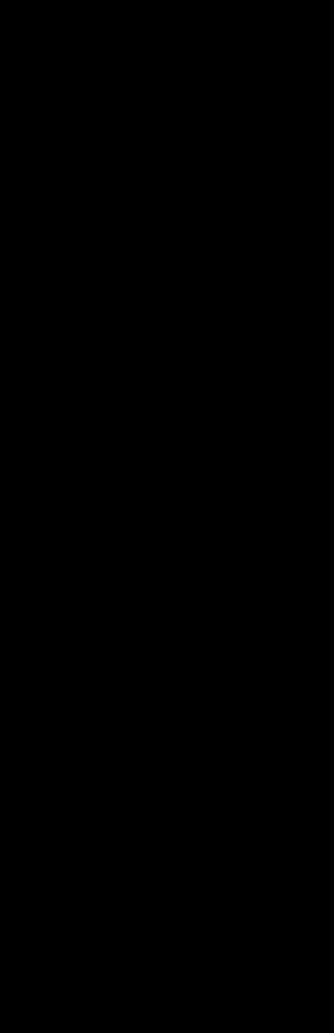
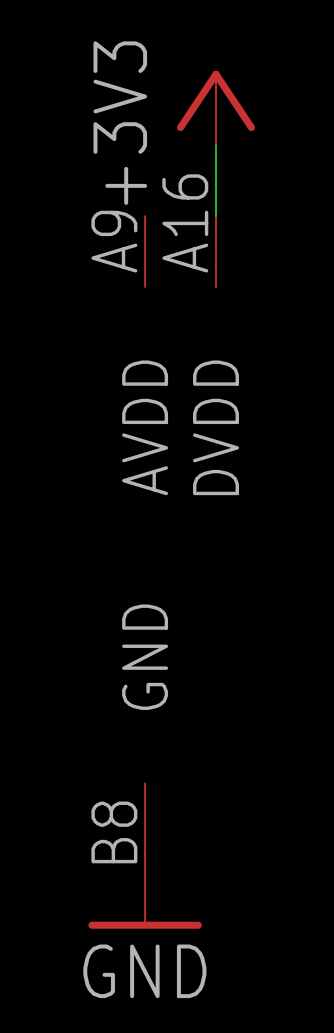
power symbol: none -> +3V3 (216, 108)
wire: none -> (216, 145) (216, 216)
part: none -> (180, 535)
power symbol: none -> GND (145, 891)

